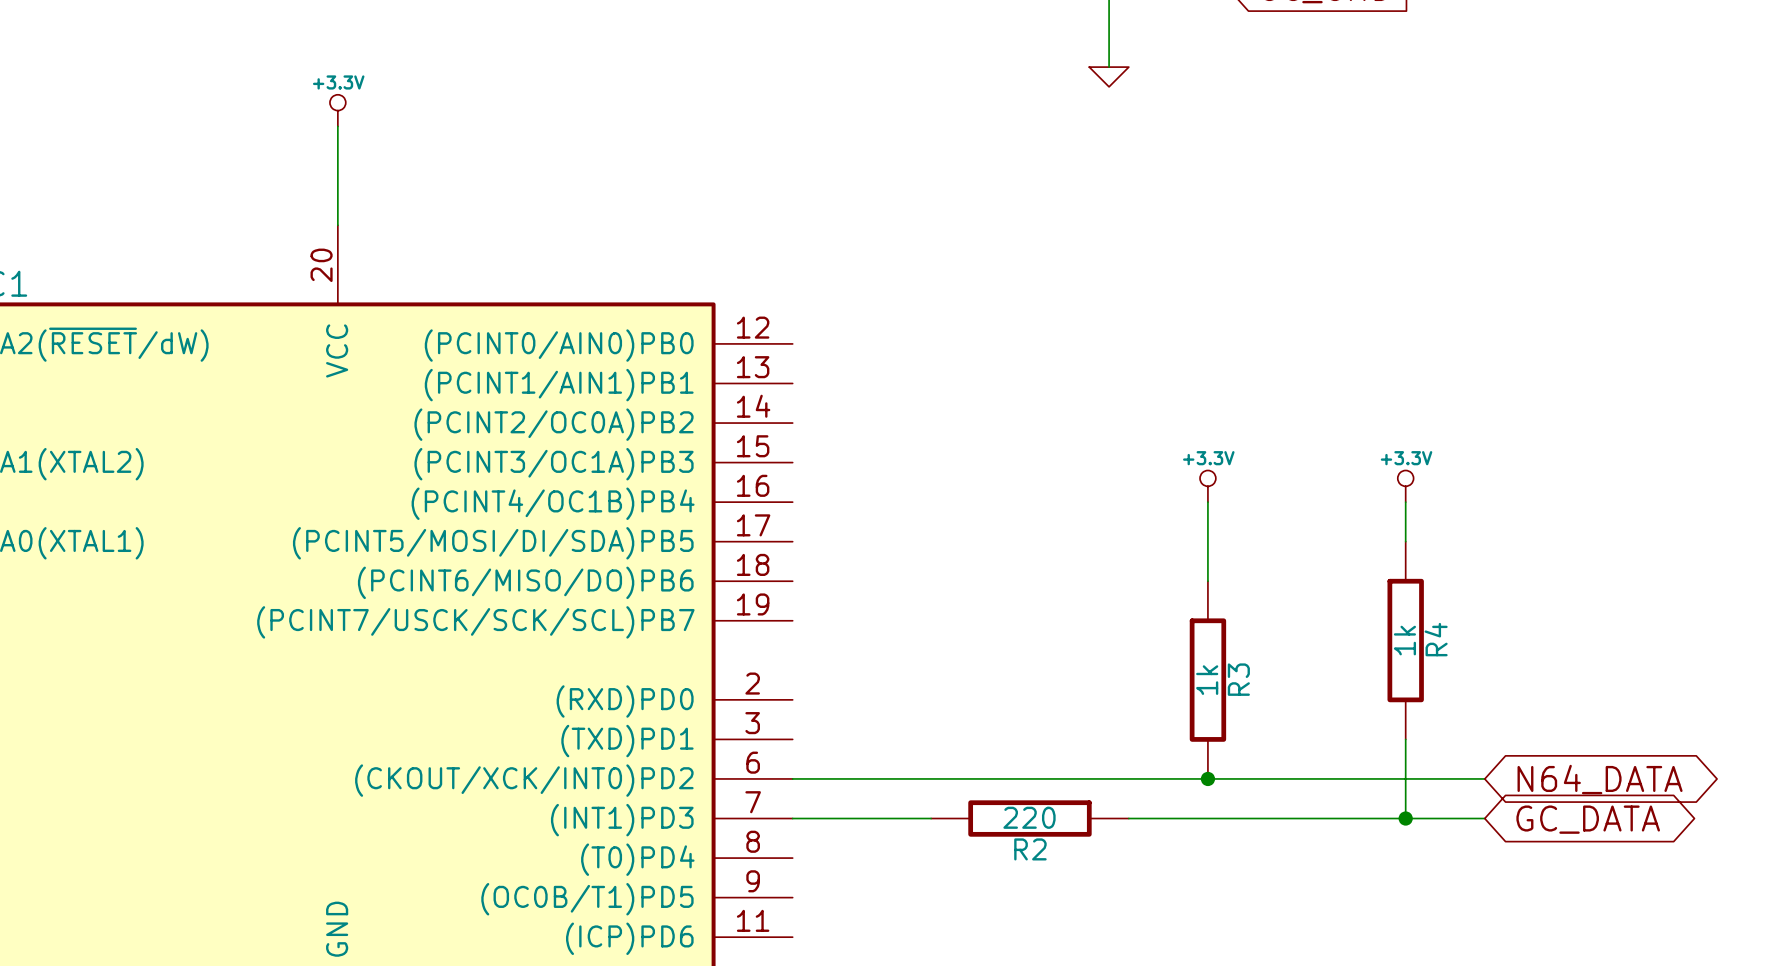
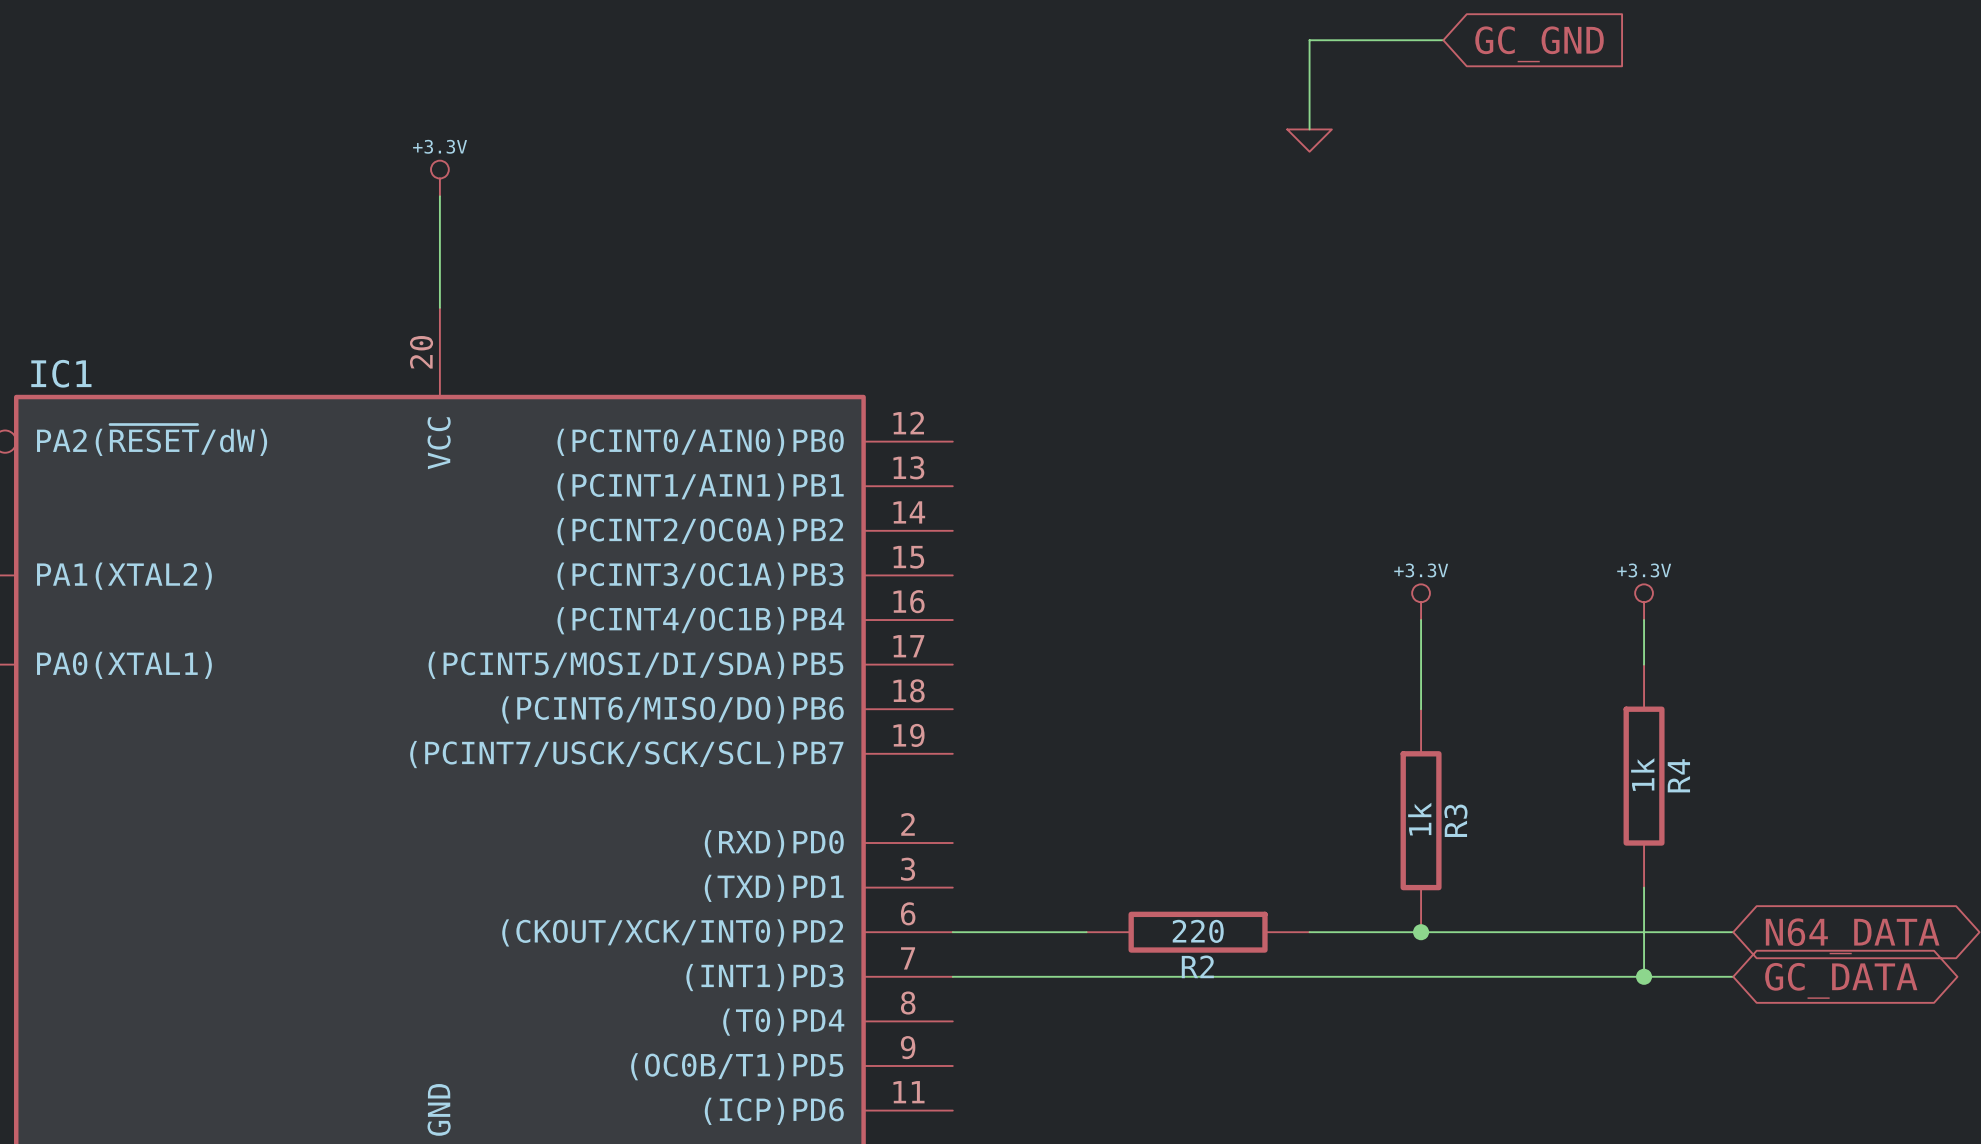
wire: (911, 778) (1109, 778) -> (1108, 976) (1331, 976)
R2 position: (1029, 818) -> (1198, 932)

